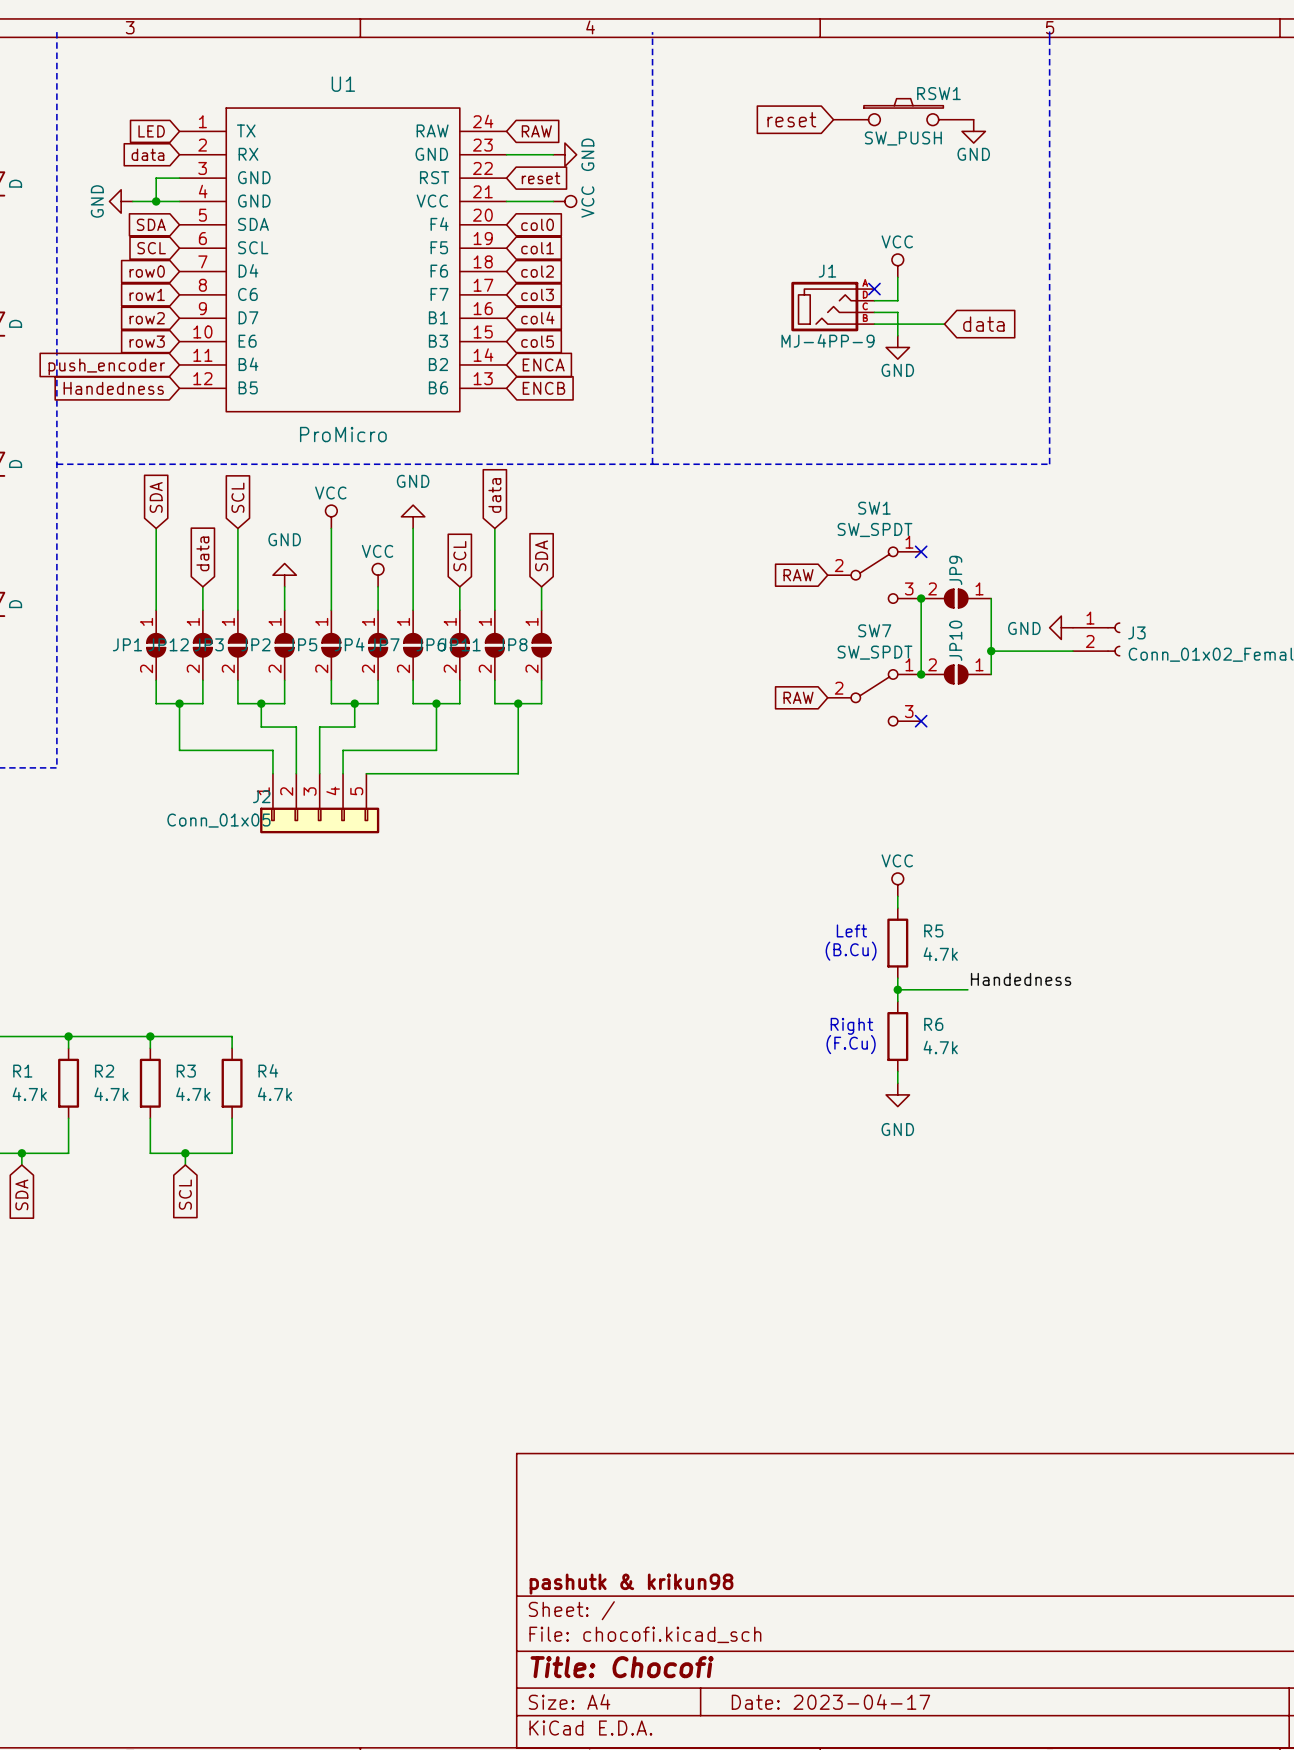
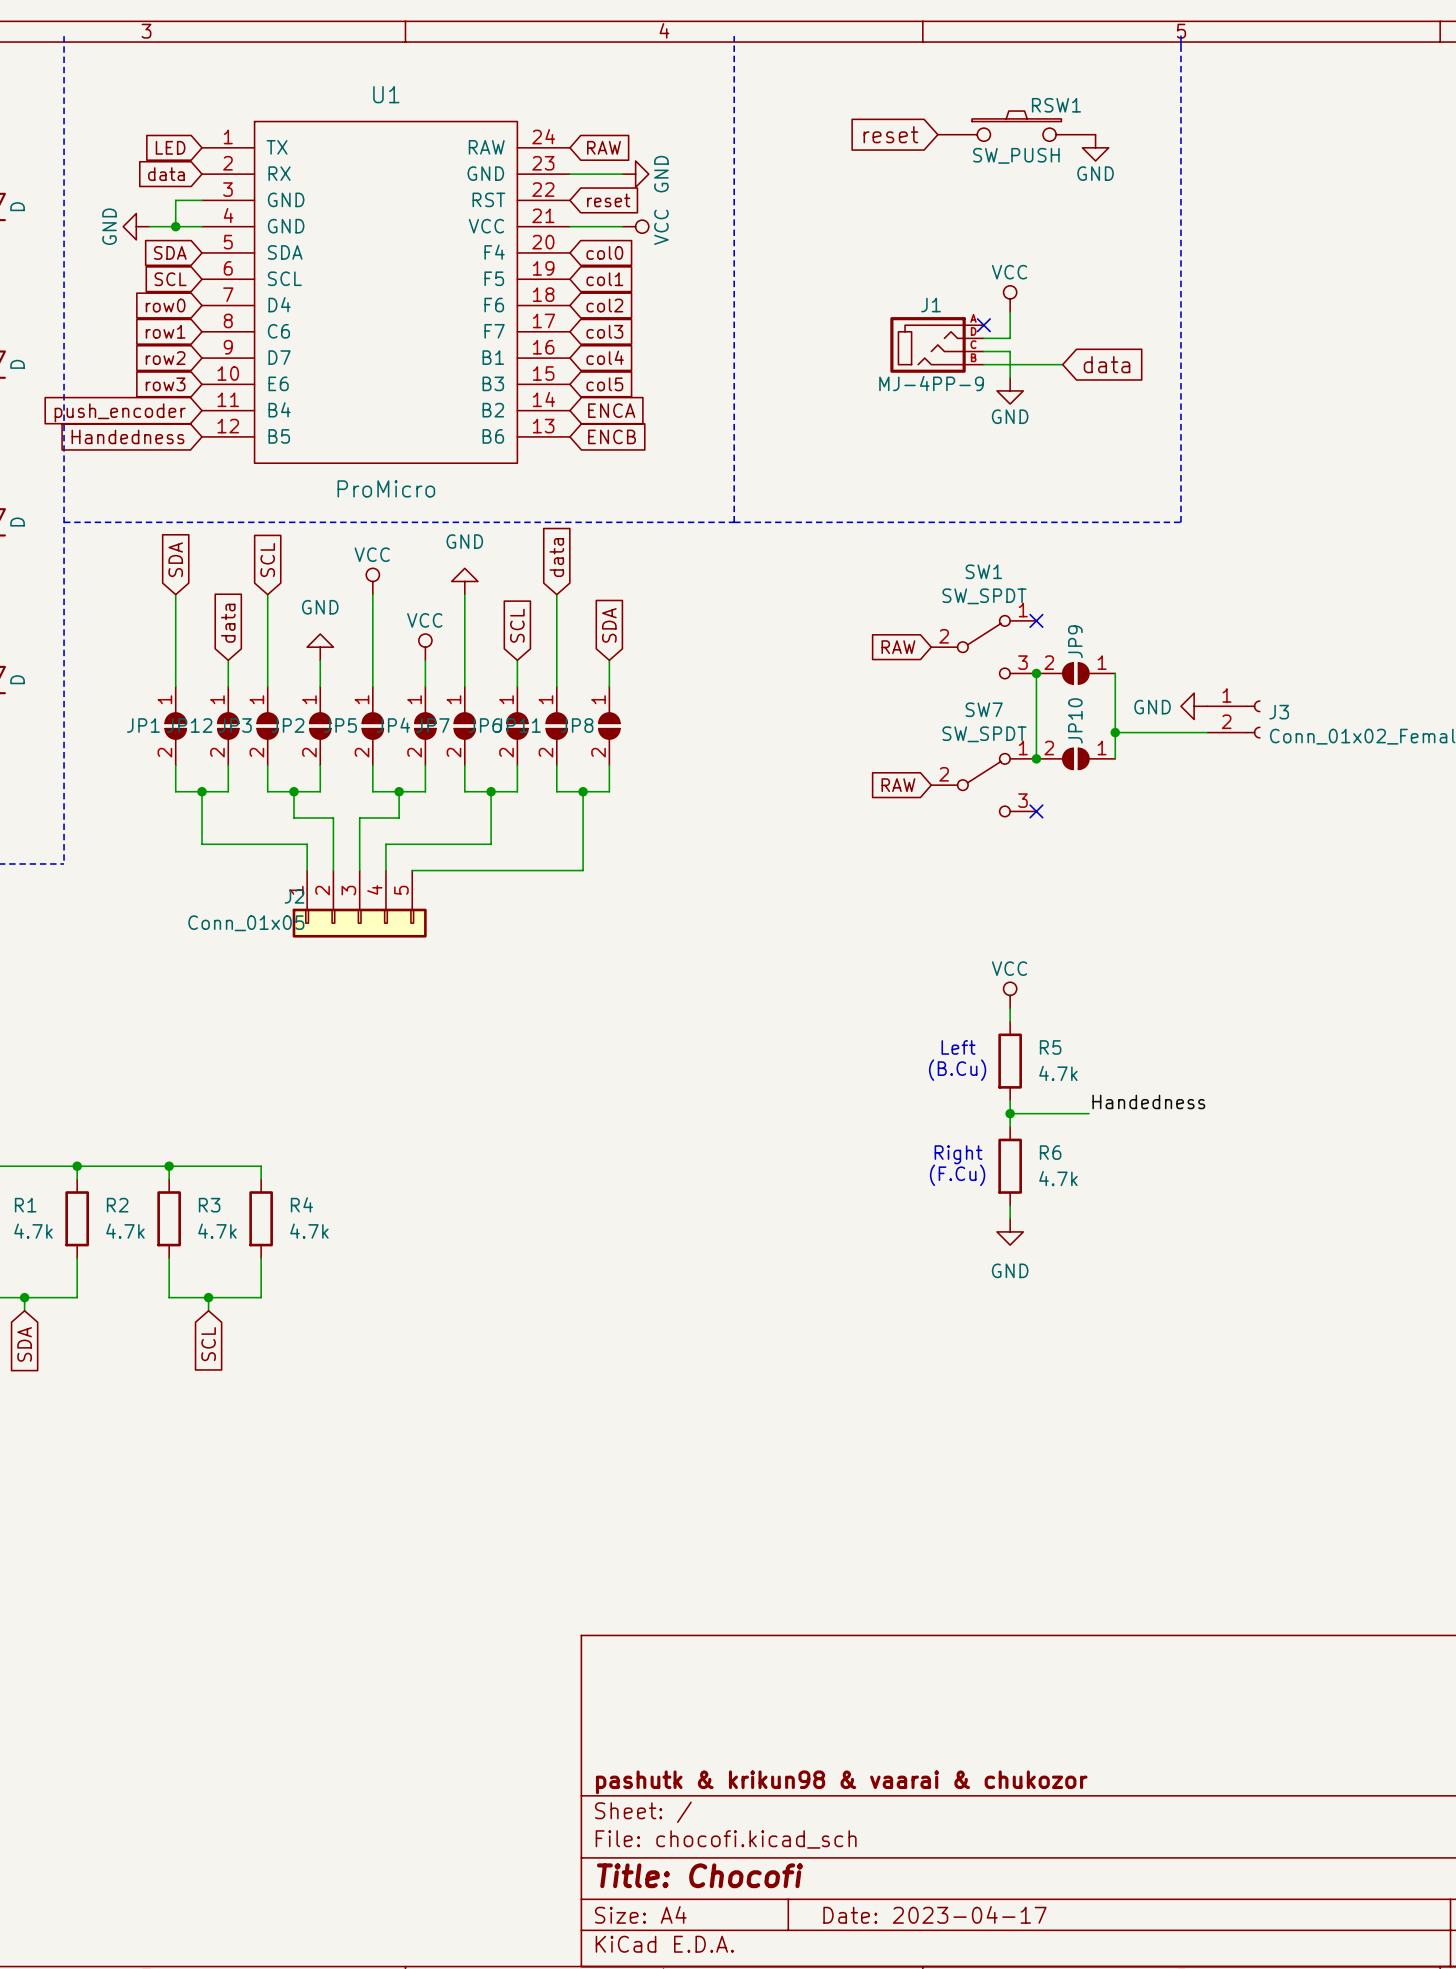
title block: pashutk & krikun98 (631, 1584) -> pashutk & krikun98 & vaarai & chukozor (841, 1782)

